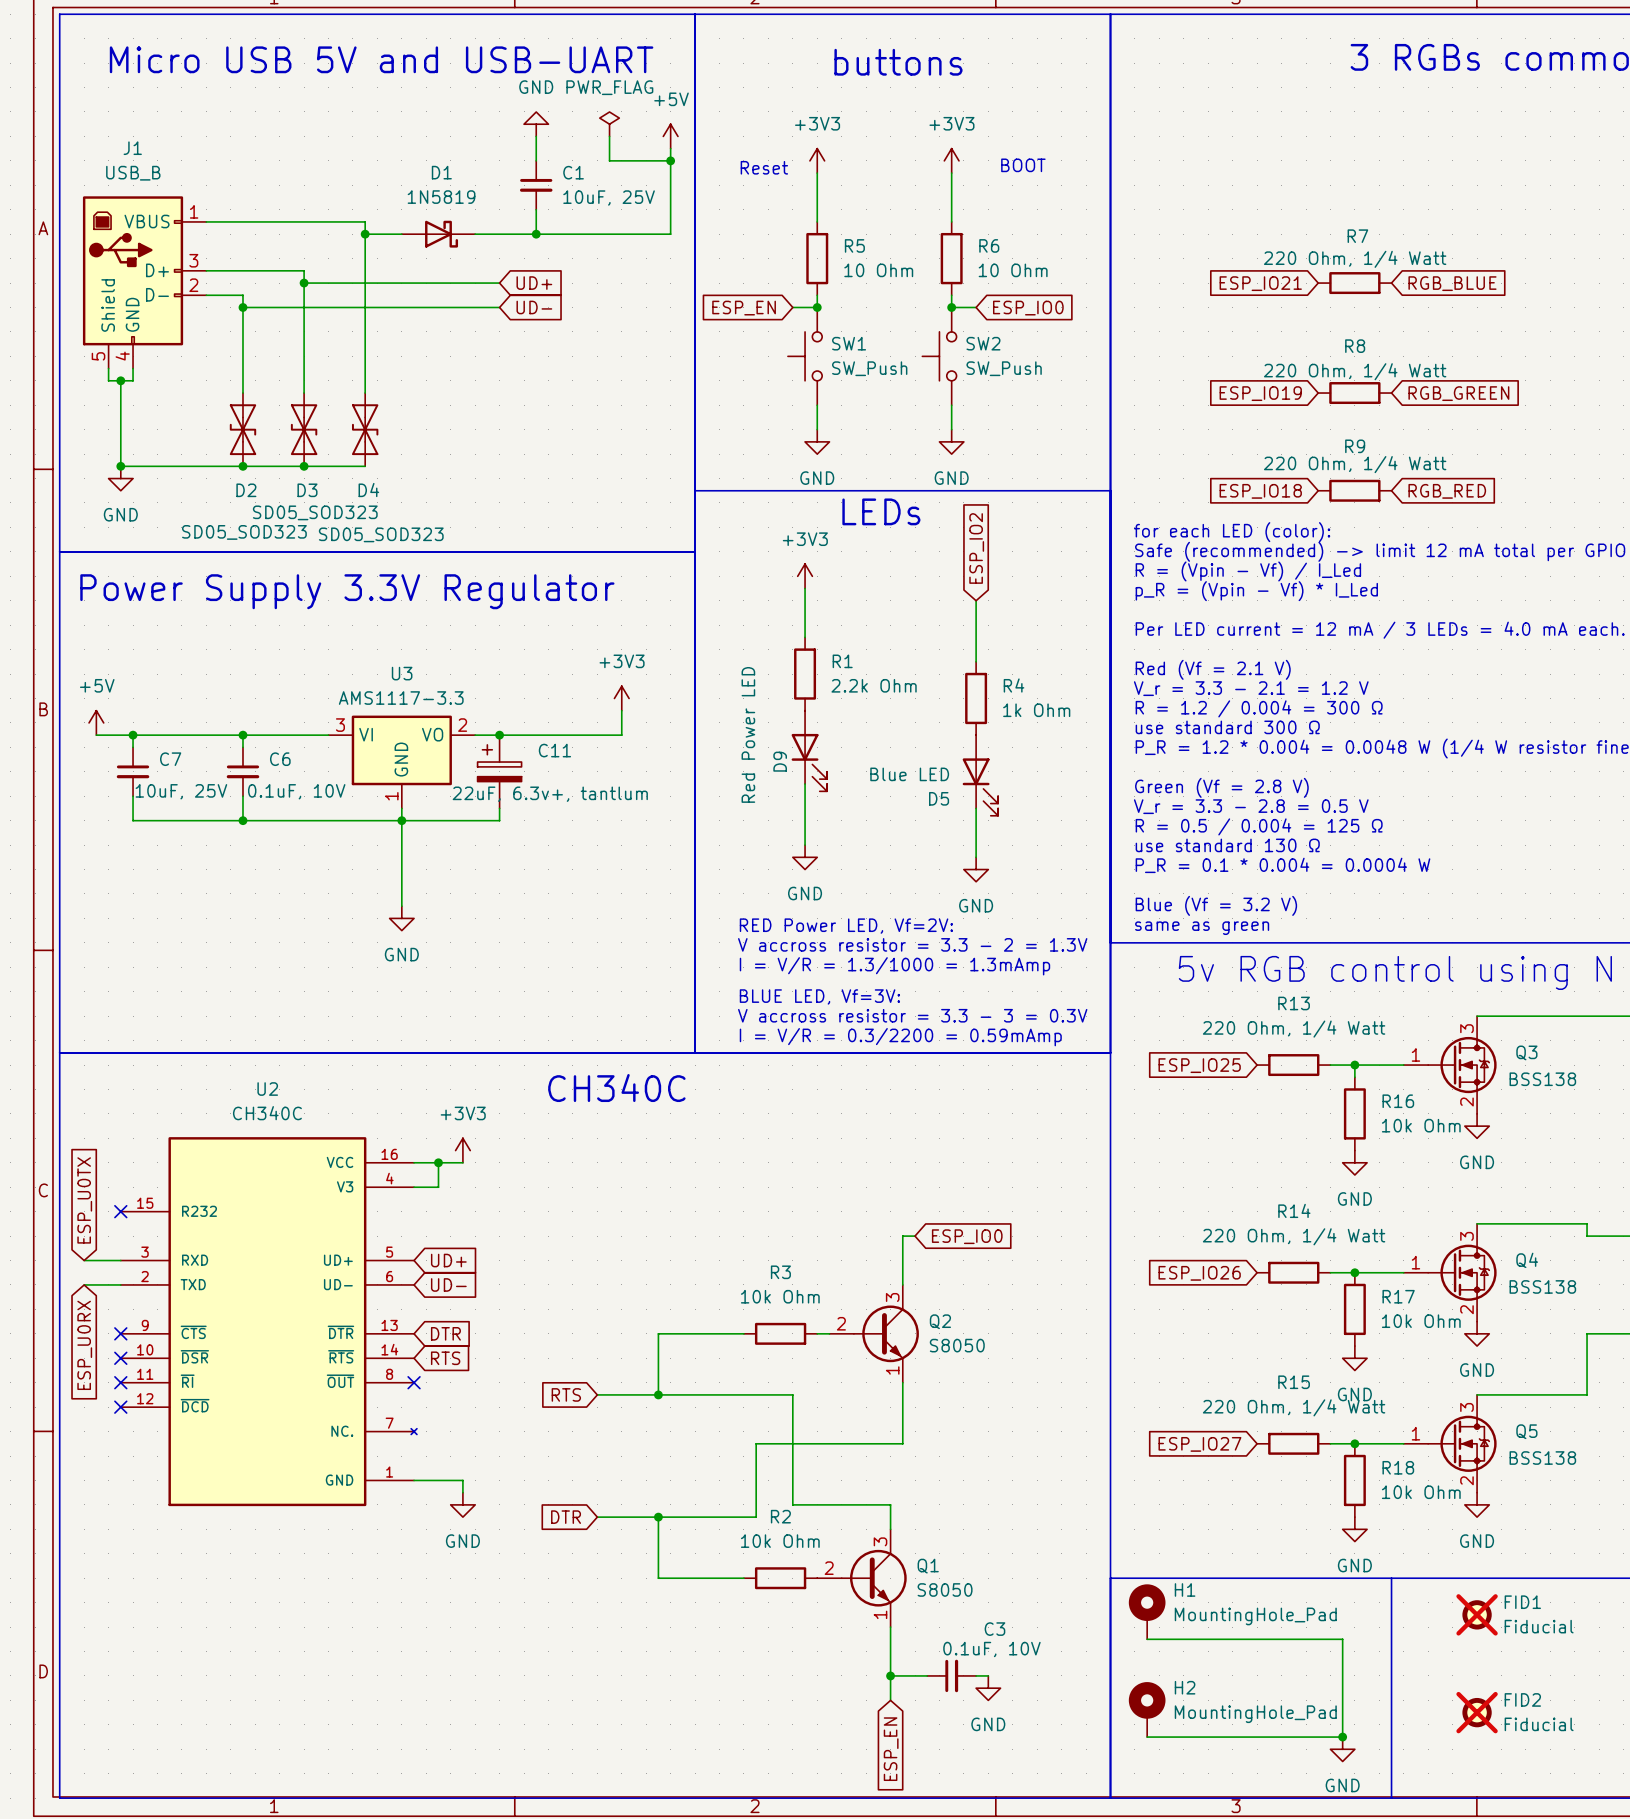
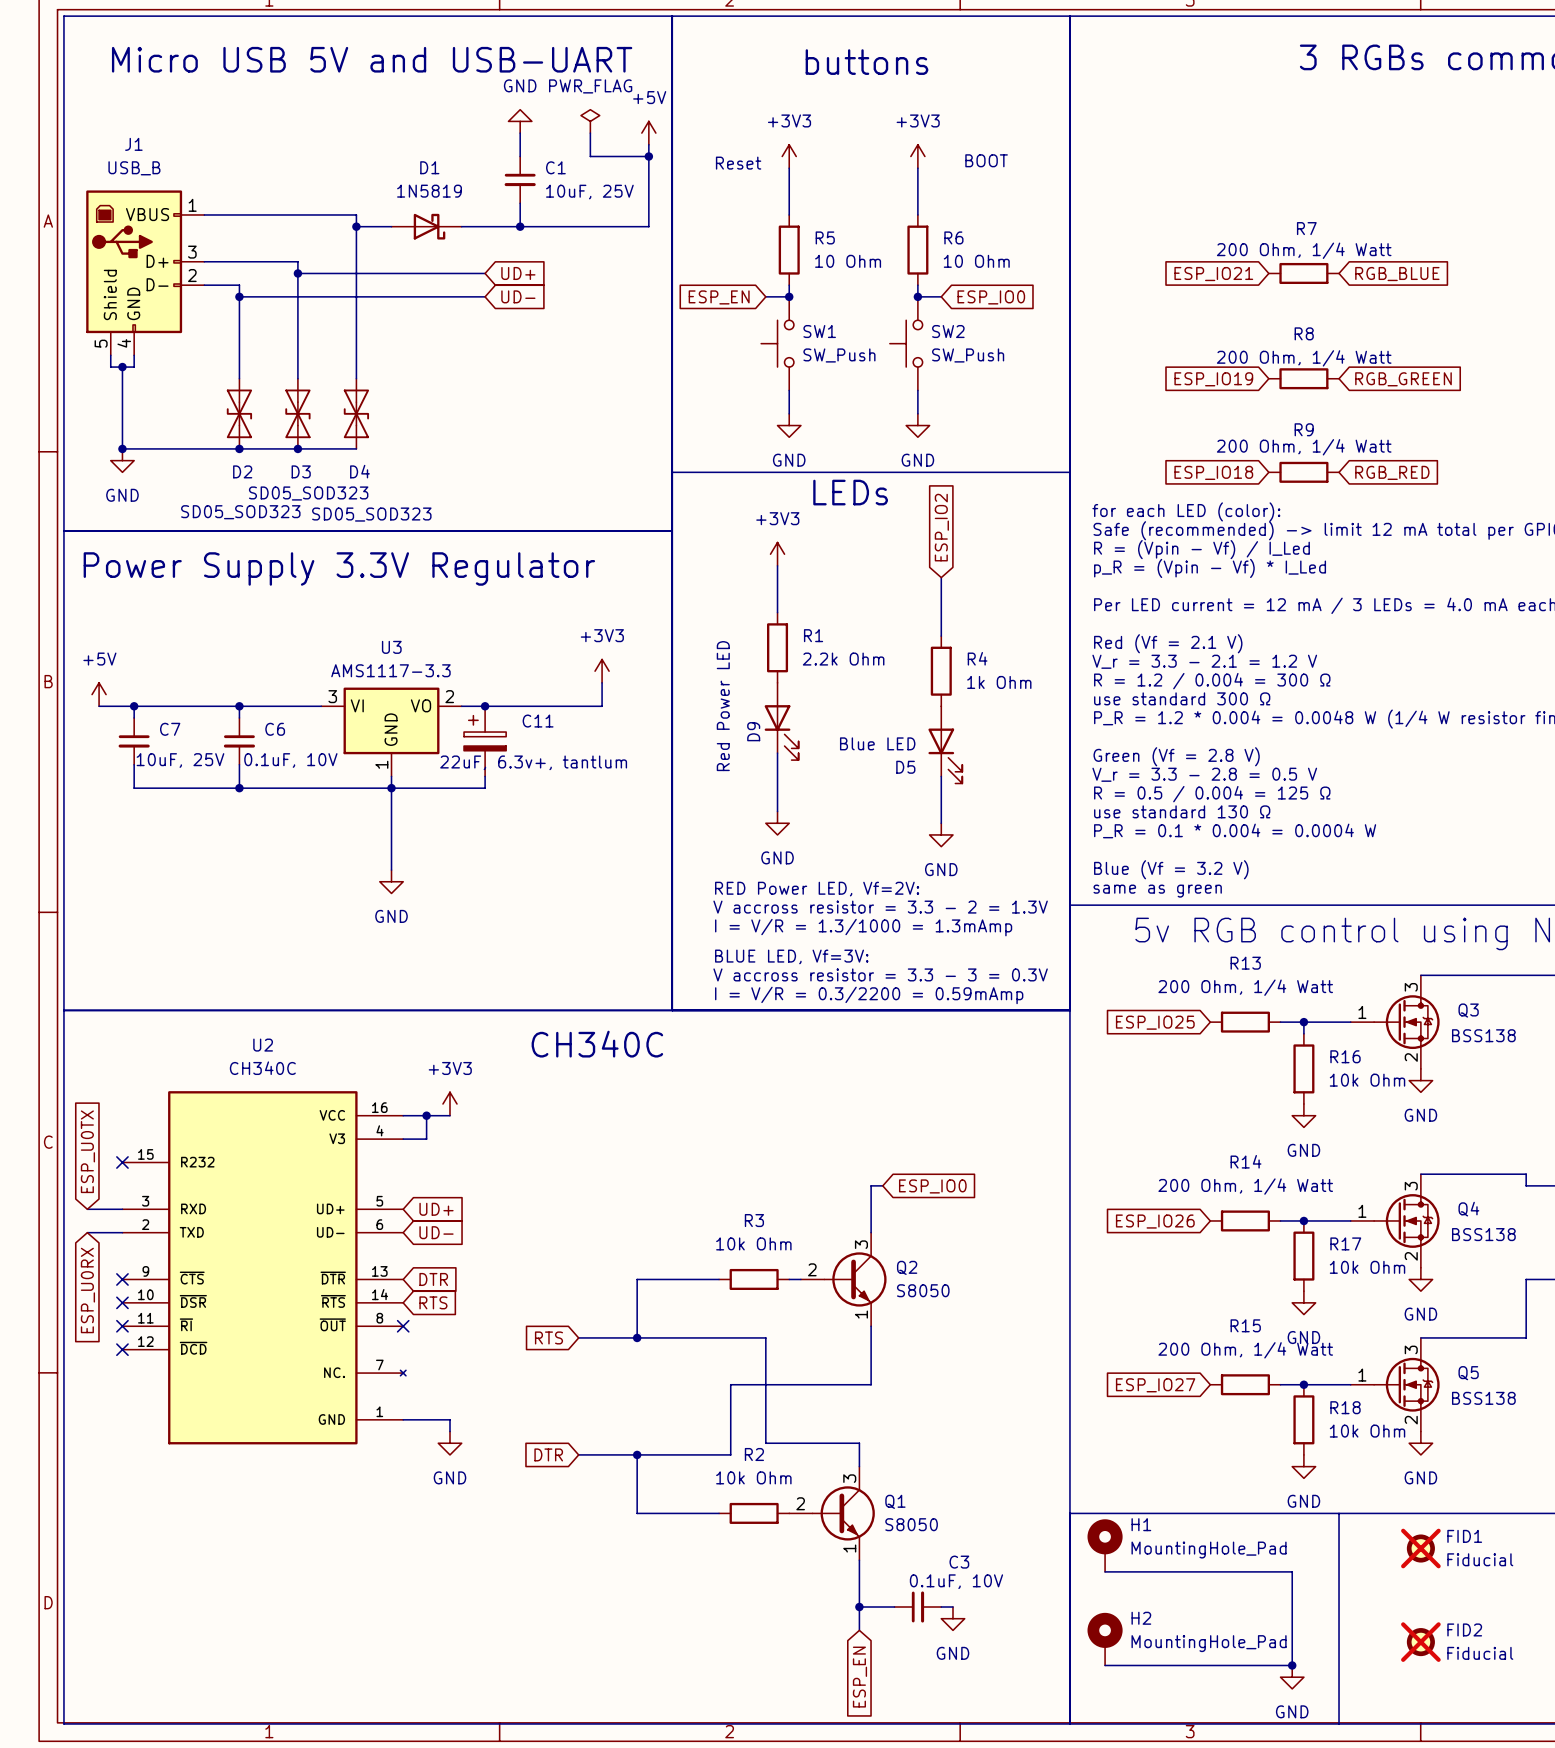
R7 value: 220 Ohm, 1/4 Watt (1355, 259) -> 200 Ohm, 1/4 Watt (1304, 250)
R8 value: 220 Ohm, 1/4 Watt (1355, 371) -> 200 Ohm, 1/4 Watt (1304, 358)
R9 value: 220 Ohm, 1/4 Watt (1355, 464) -> 200 Ohm, 1/4 Watt (1304, 447)
R13 value: 220 Ohm, 1/4 Watt (1294, 1029) -> 200 Ohm, 1/4 Watt (1245, 987)
R14 value: 220 Ohm, 1/4 Watt (1294, 1236) -> 200 Ohm, 1/4 Watt (1245, 1186)
R15 value: 220 Ohm, 1/4 Watt (1294, 1407) -> 200 Ohm, 1/4 Watt (1245, 1350)

